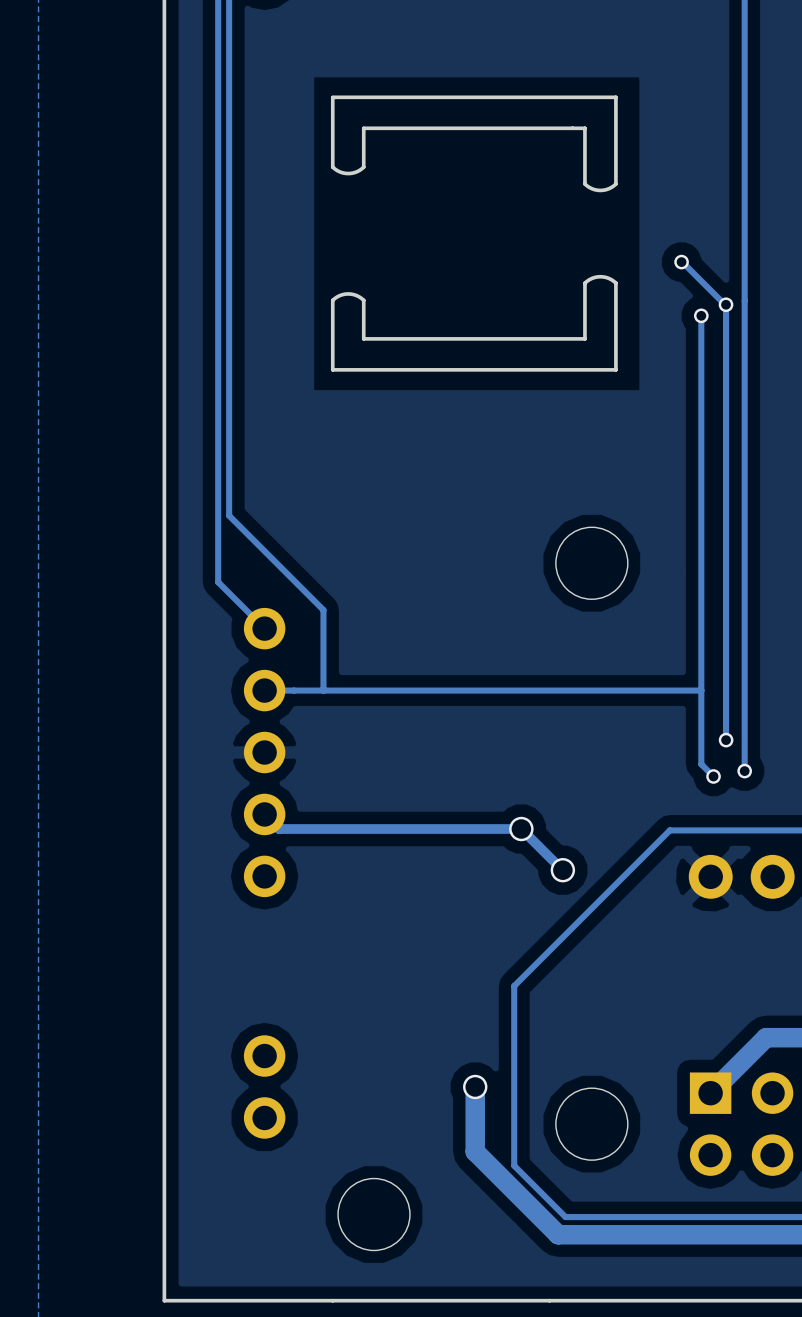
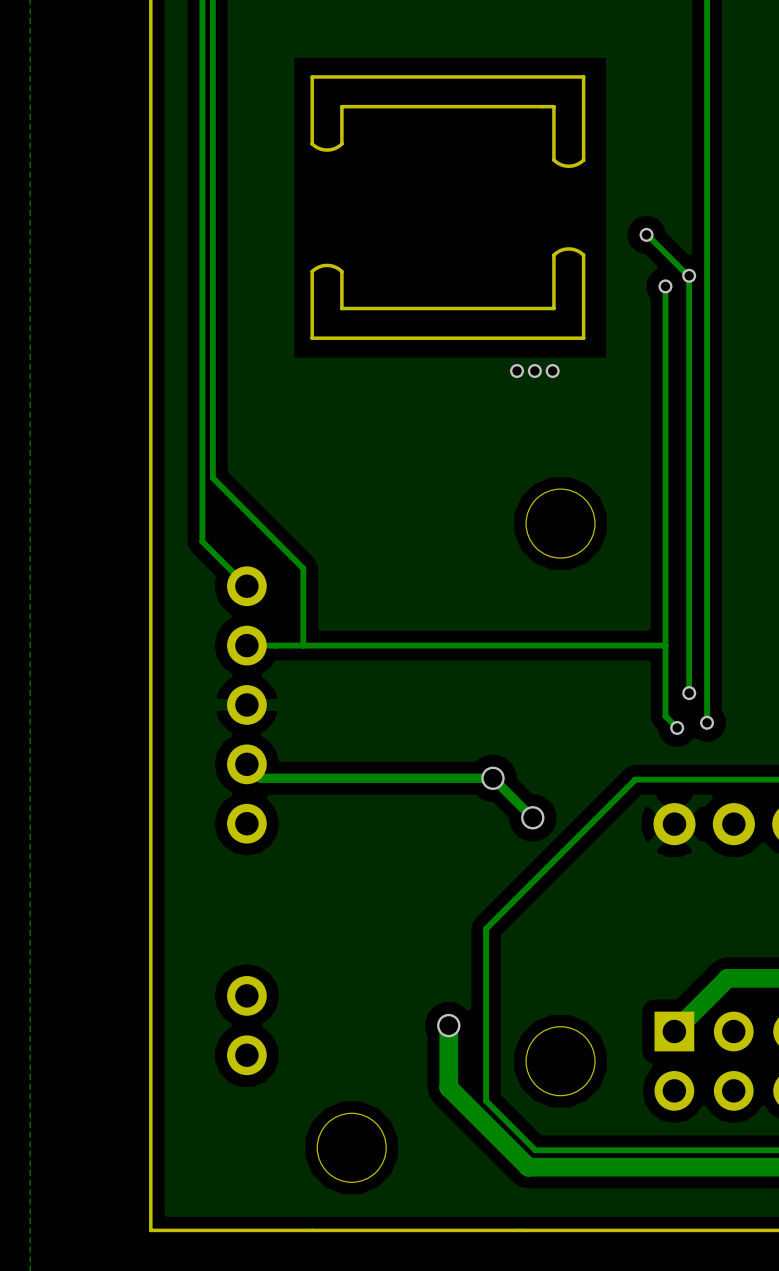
via: none -> (517, 371)
via: none -> (534, 371)
via: none -> (552, 371)

